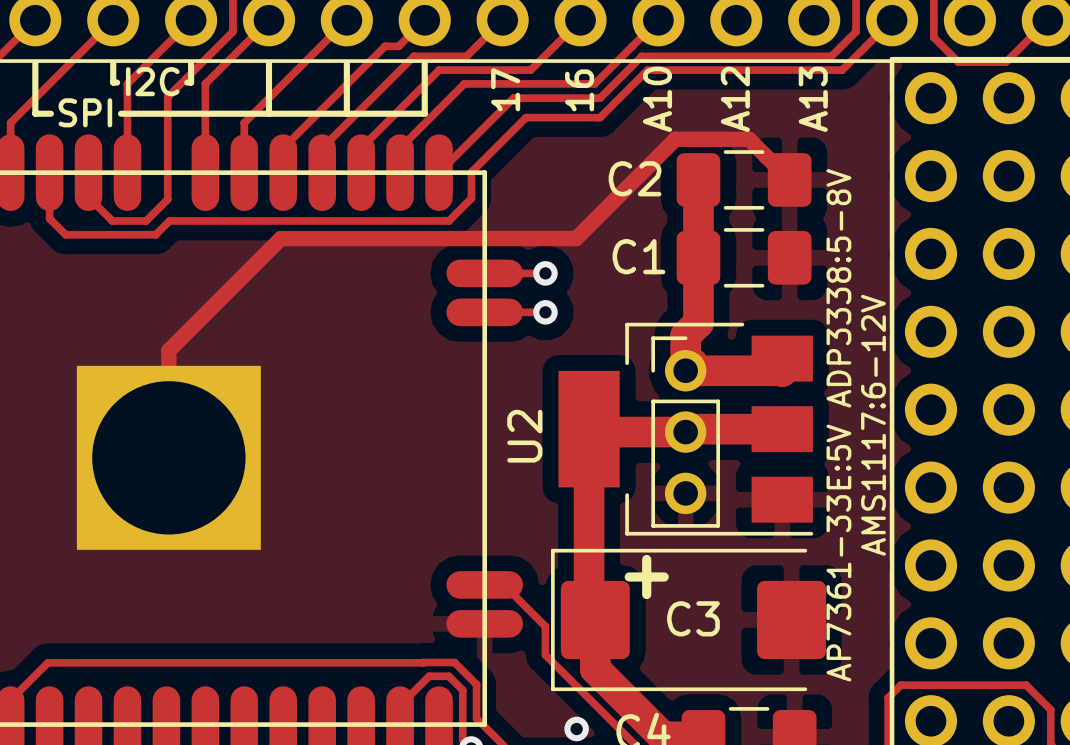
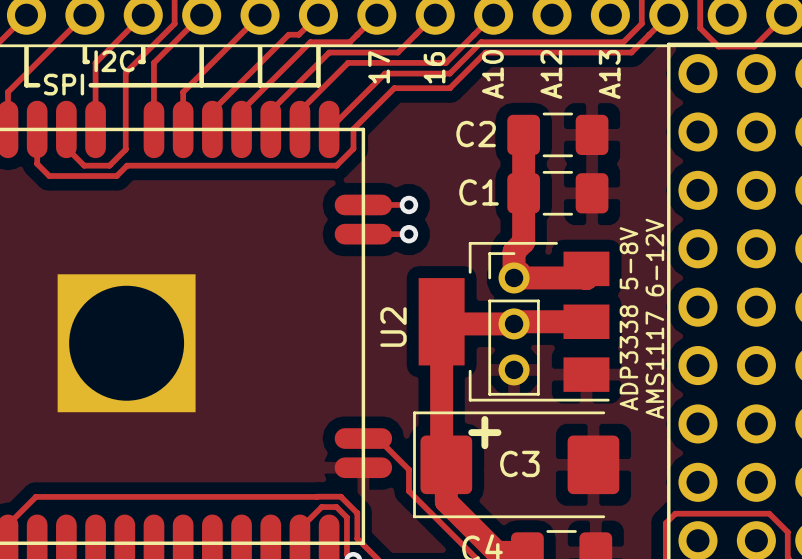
track: (789, 179) (749, 139) (675, 139) (576, 238) (280, 238) (168, 350) (168, 457) -> none
text: AP7361-33E:5V ADP3338:5-8V (838, 425) -> ADP3338 5-8V (628, 318)
text: AMS1117:6-12V (873, 425) -> AMS1117 6-12V (654, 318)
via: (576, 729) -> none

